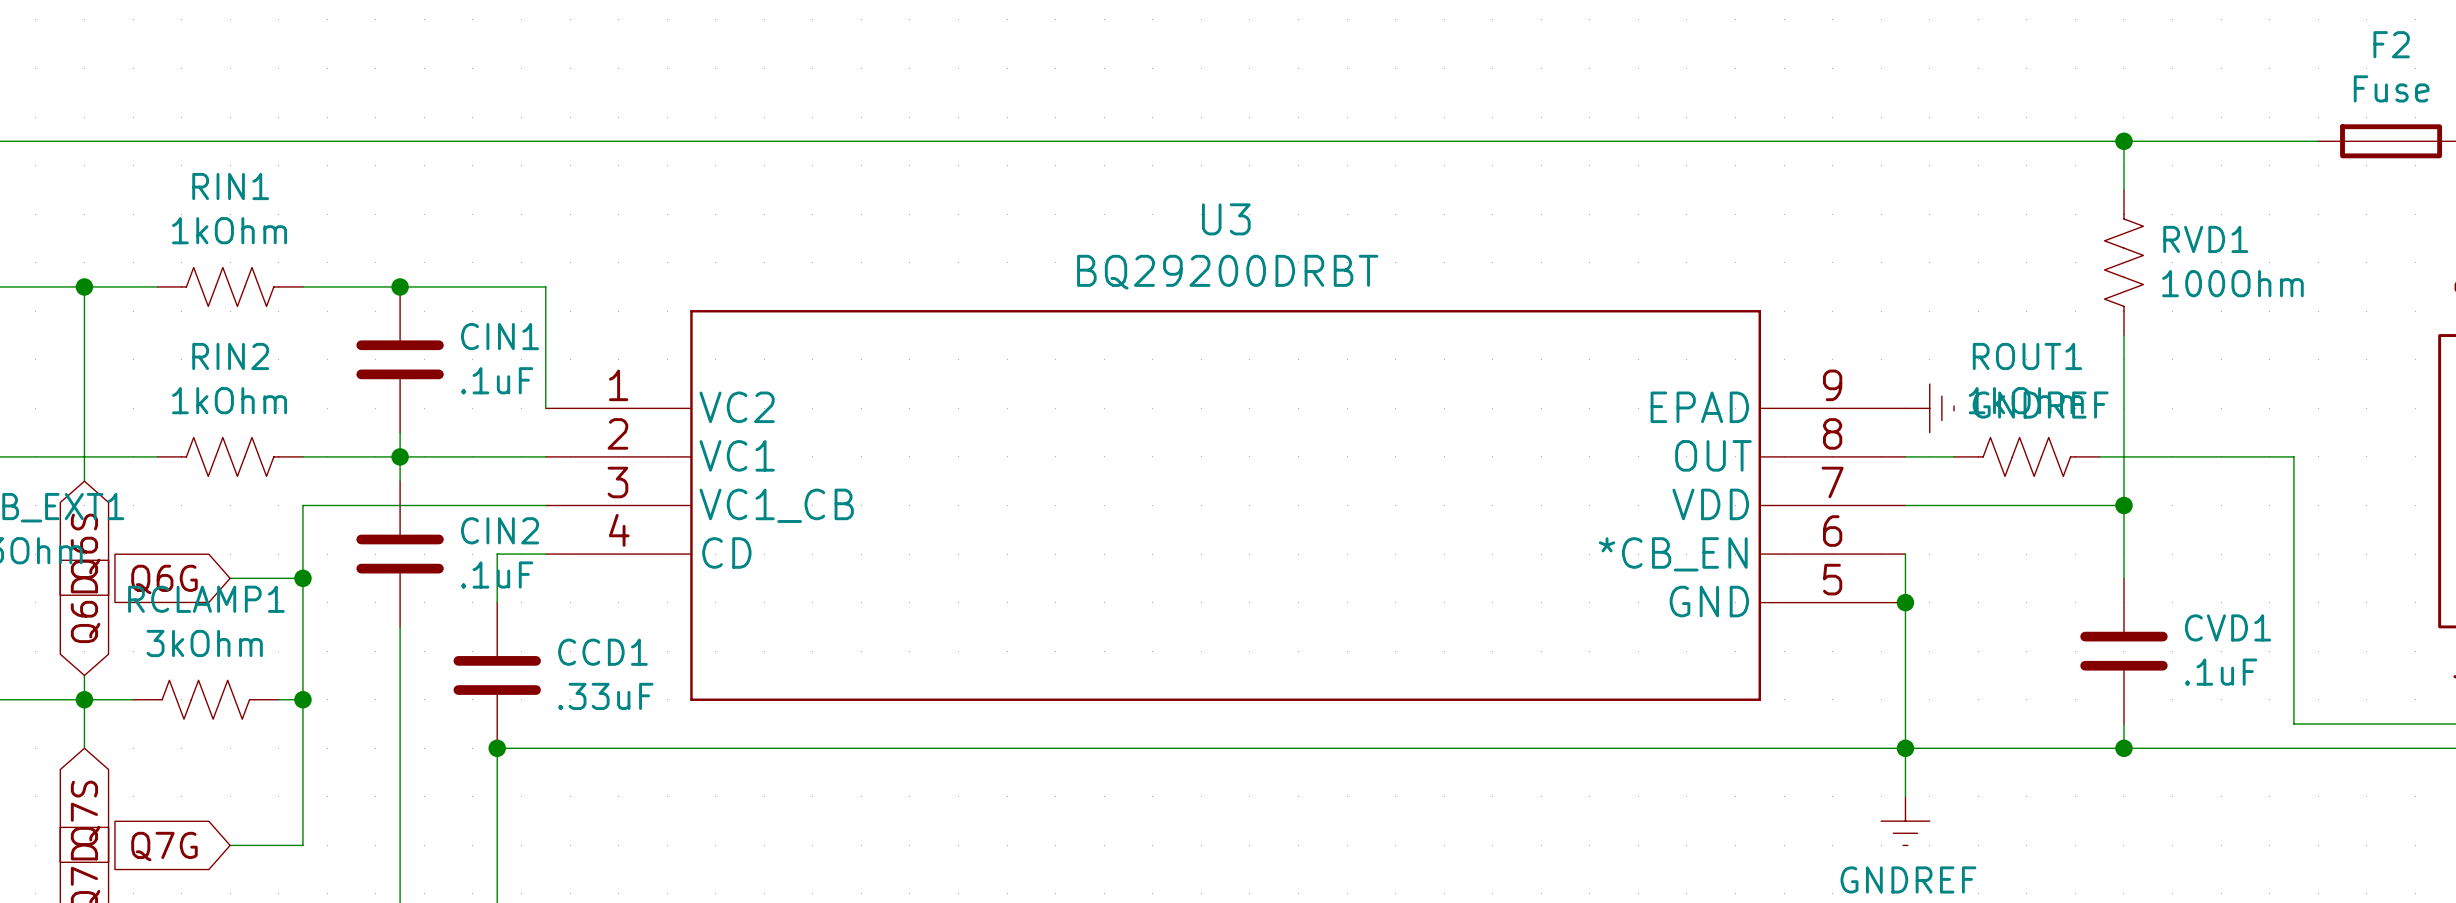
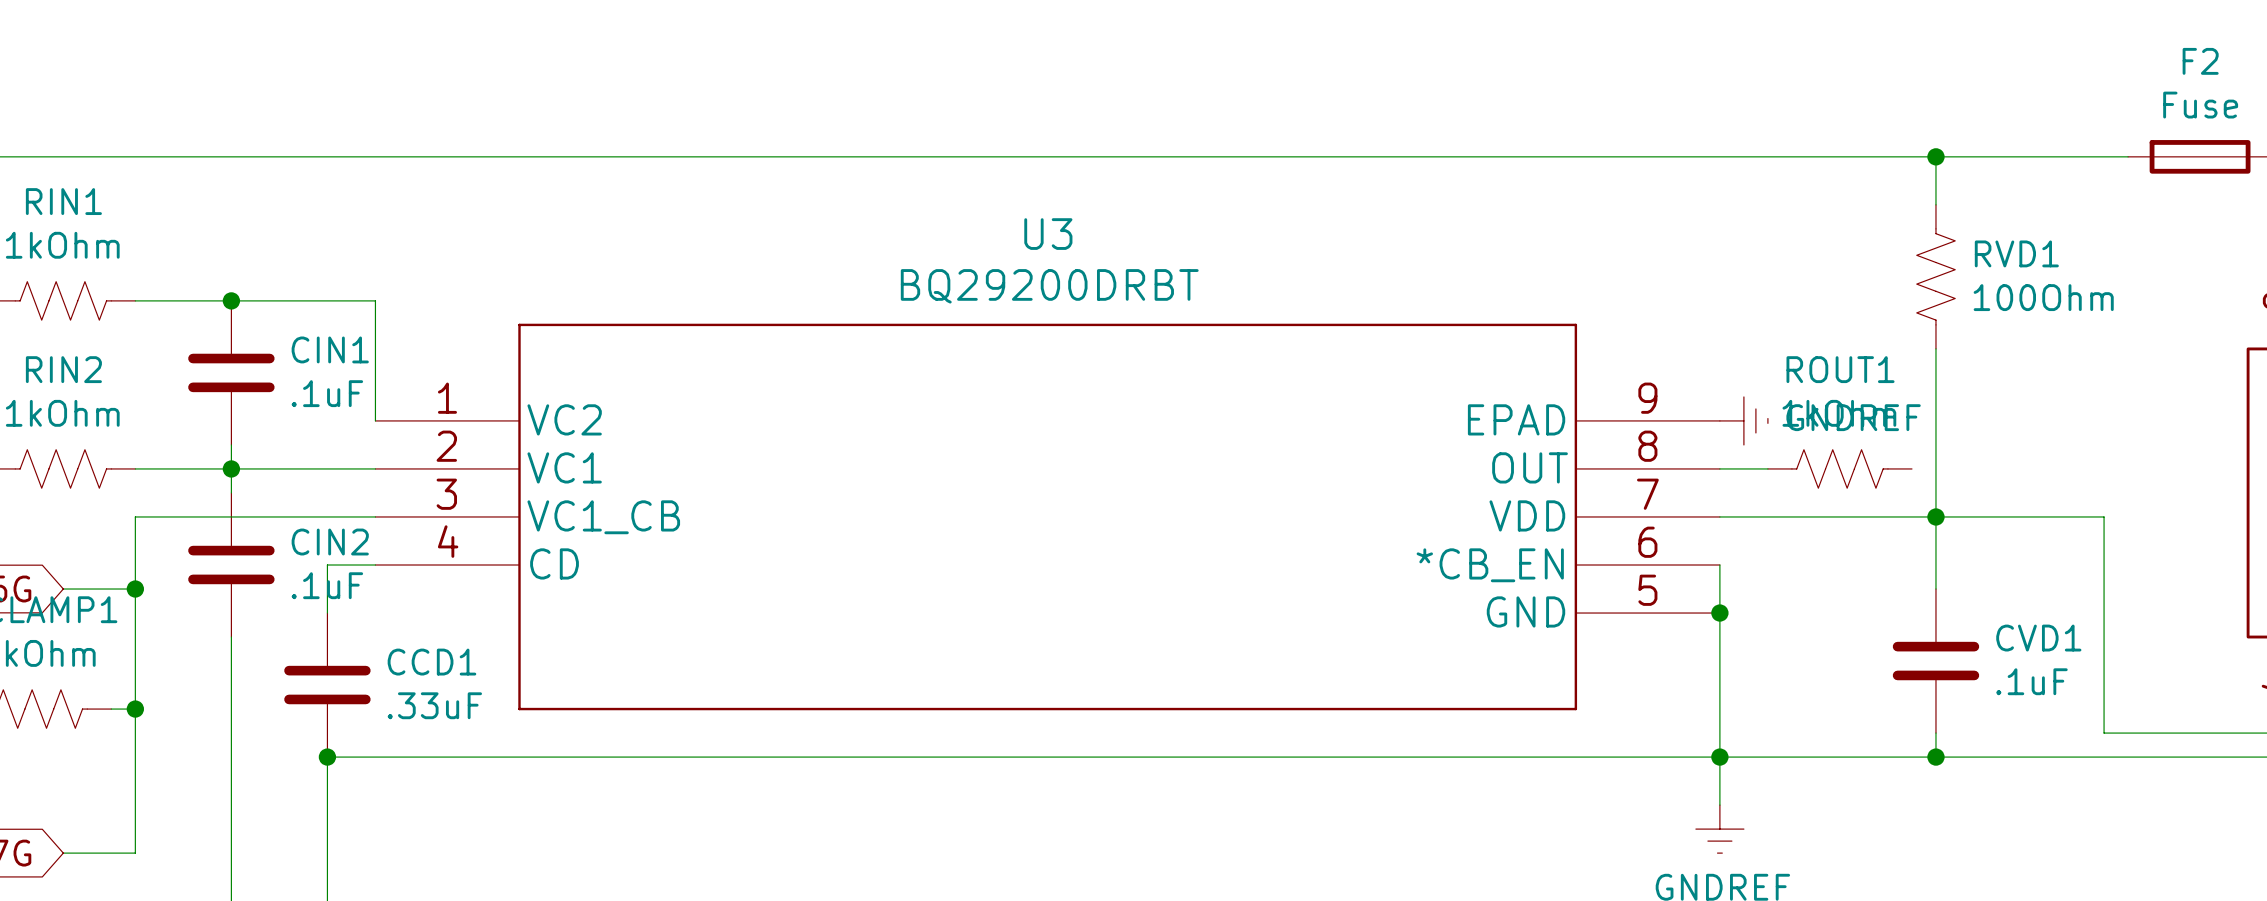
wire: (2099, 456) (2293, 456) (2293, 505) -> (1935, 516) (2104, 516)

